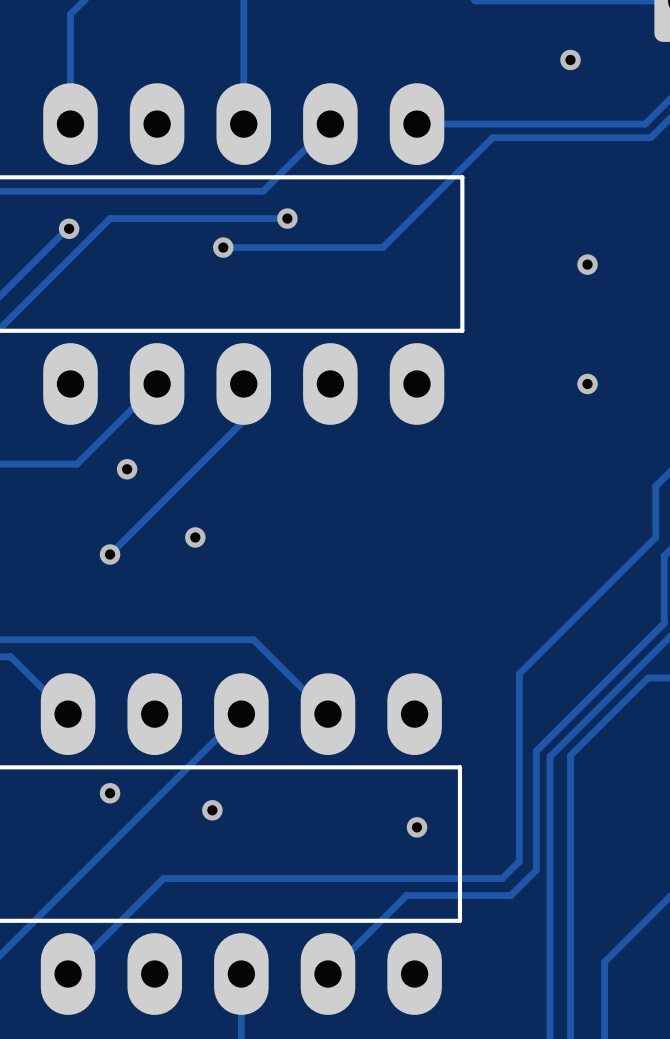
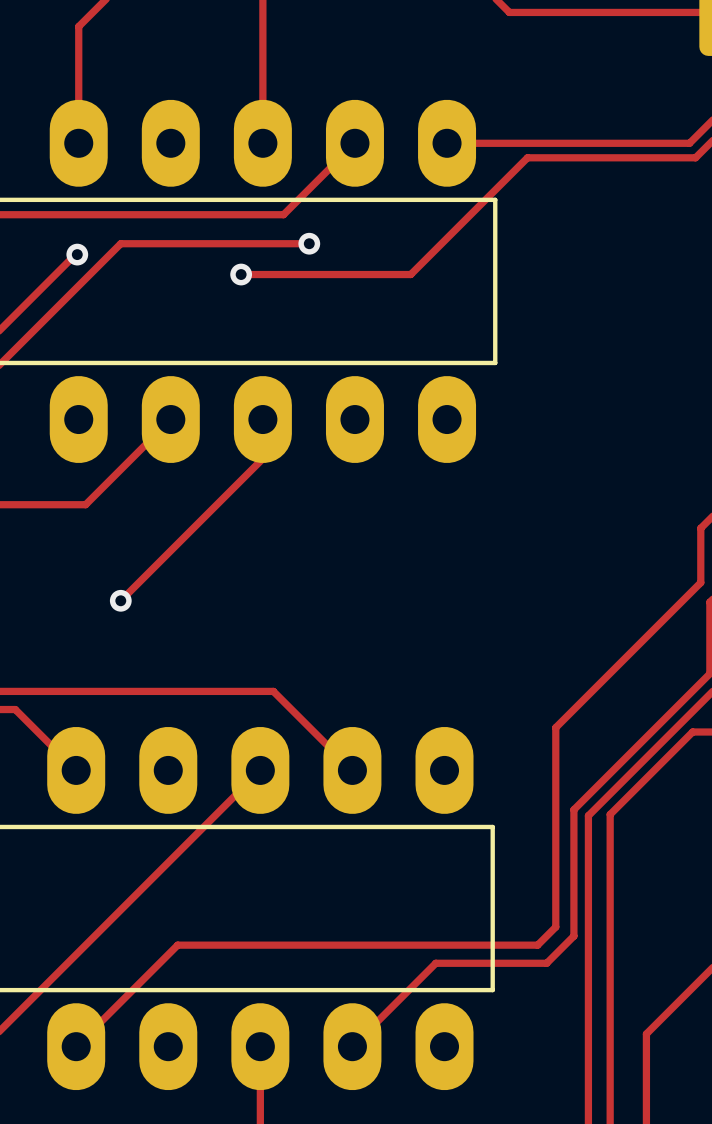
via: (570, 59) -> none
via: (587, 264) -> none
via: (587, 383) -> none
via: (127, 469) -> none
via: (195, 537) -> none
via: (110, 793) -> none
via: (212, 810) -> none
via: (417, 827) -> none

